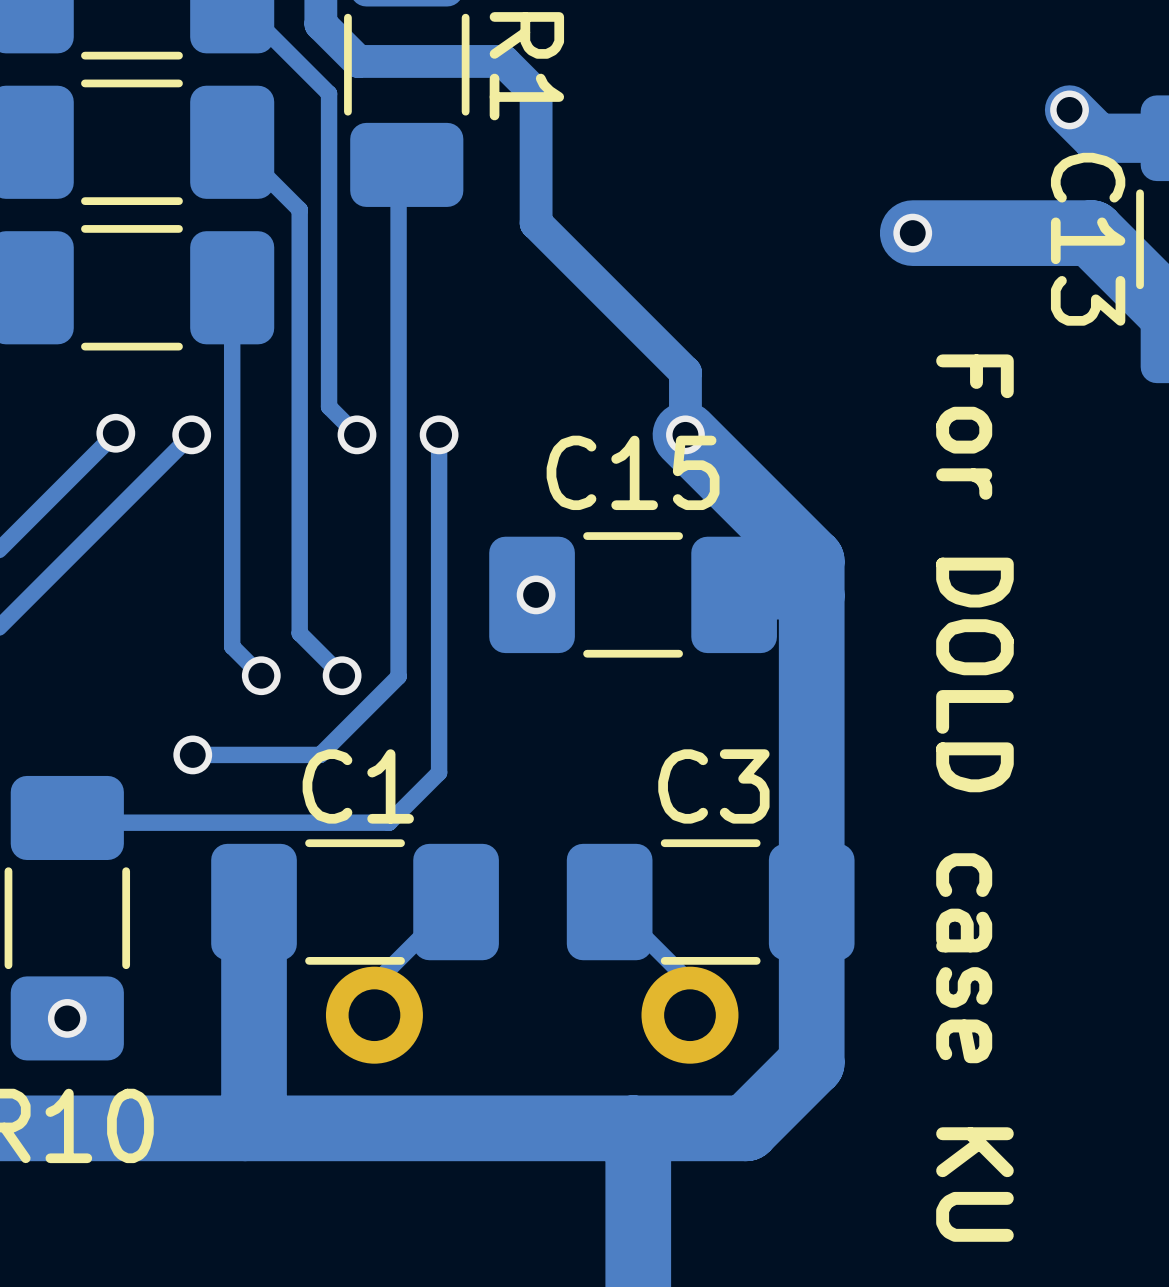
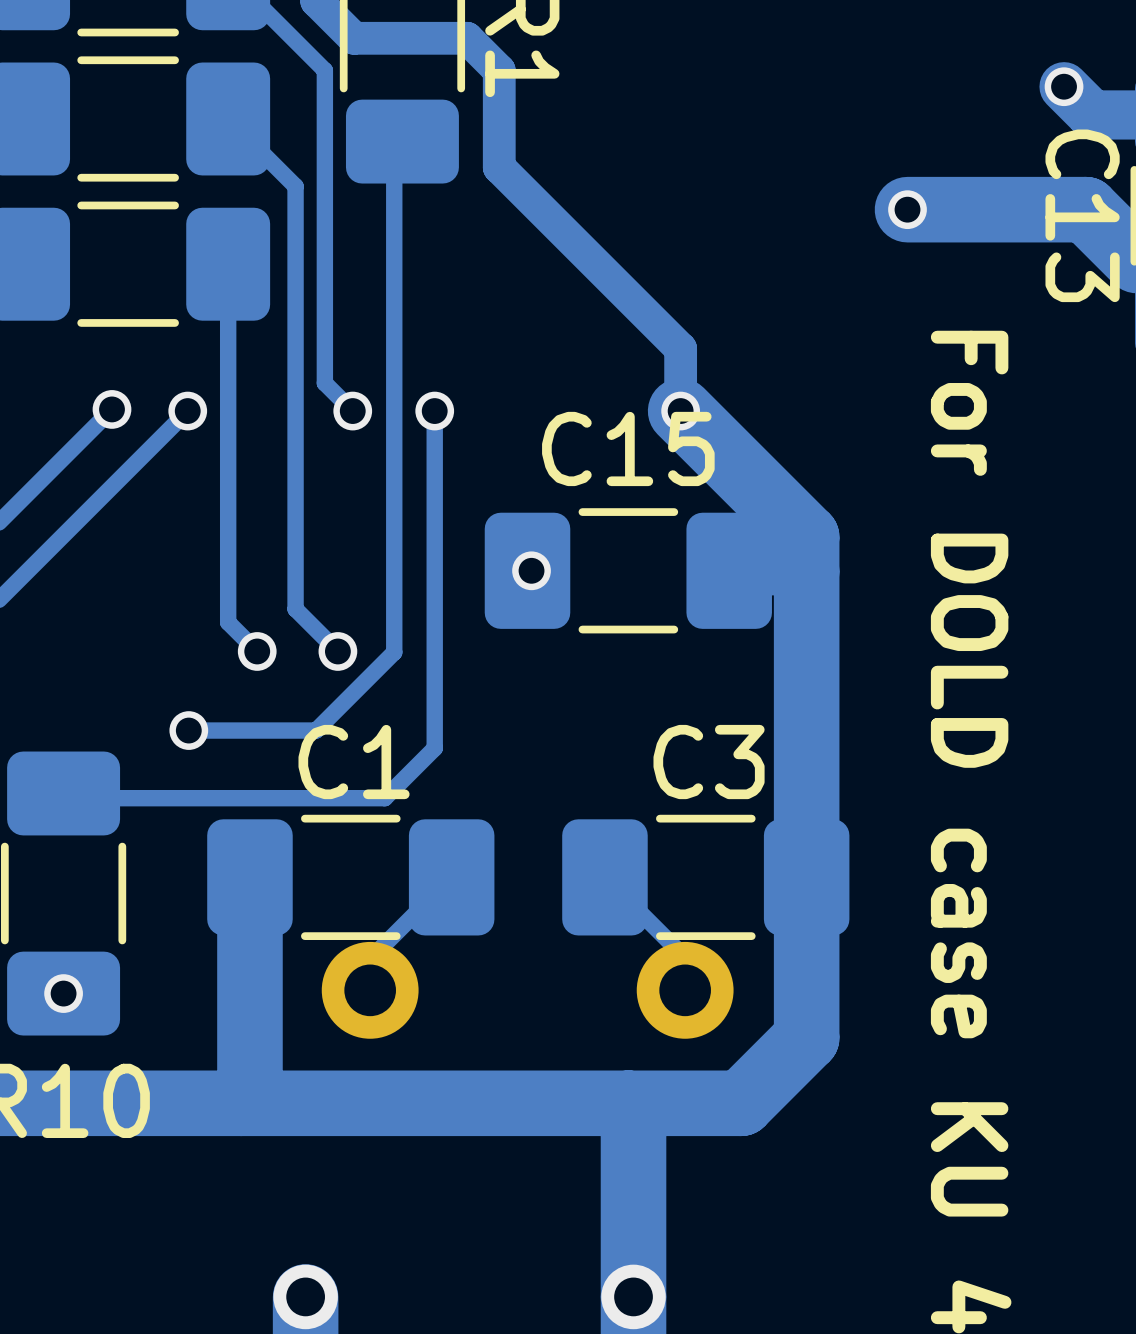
track: (471, 61) (503, 61) (536, 93) (536, 223) -> (466, 38) (499, 70) (499, 167) (531, 199)

